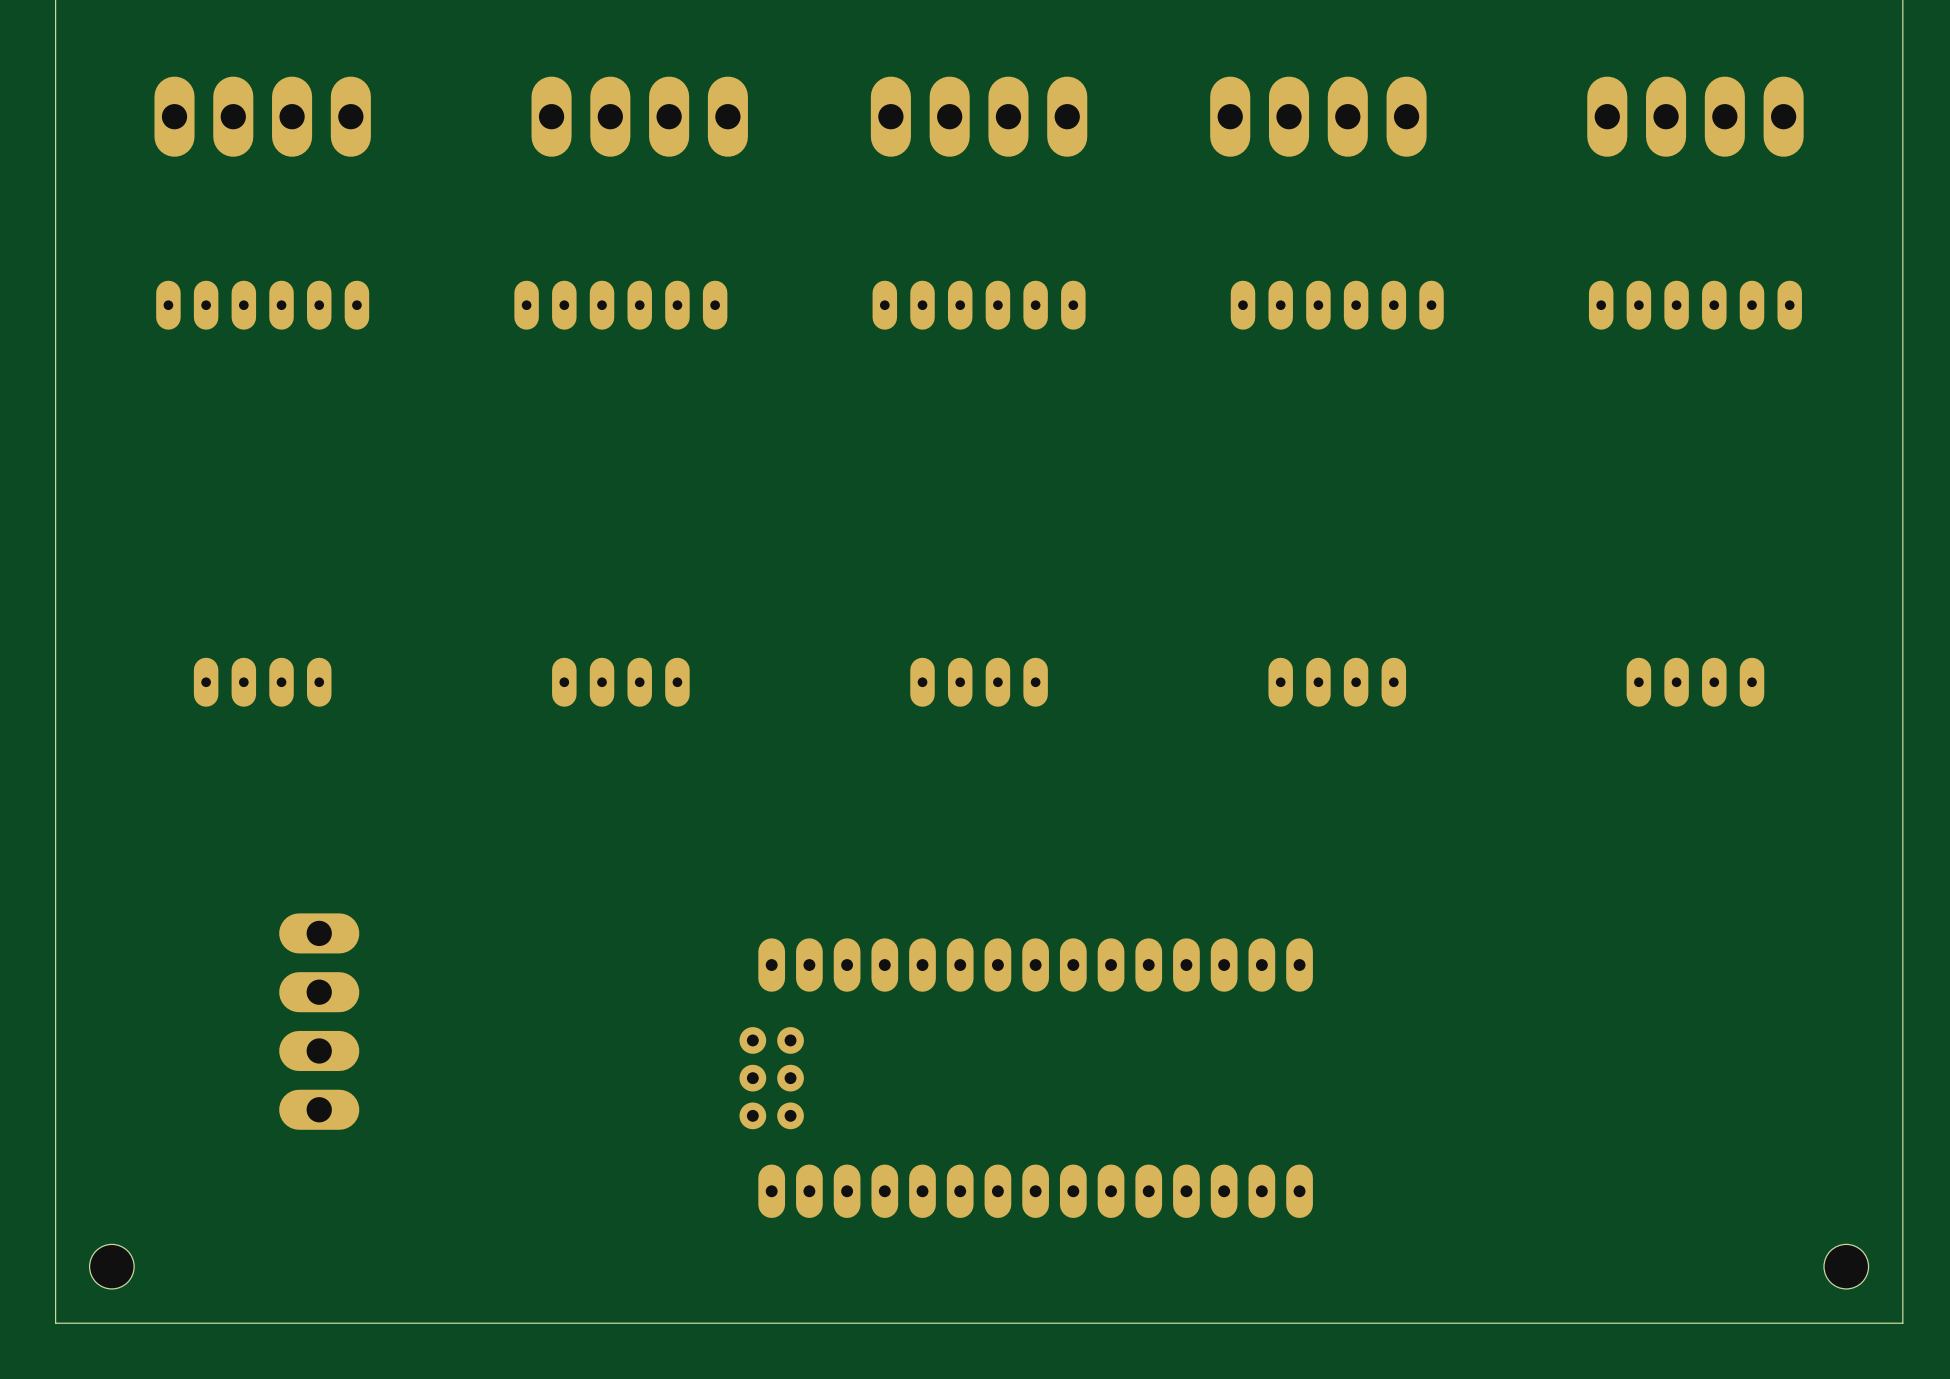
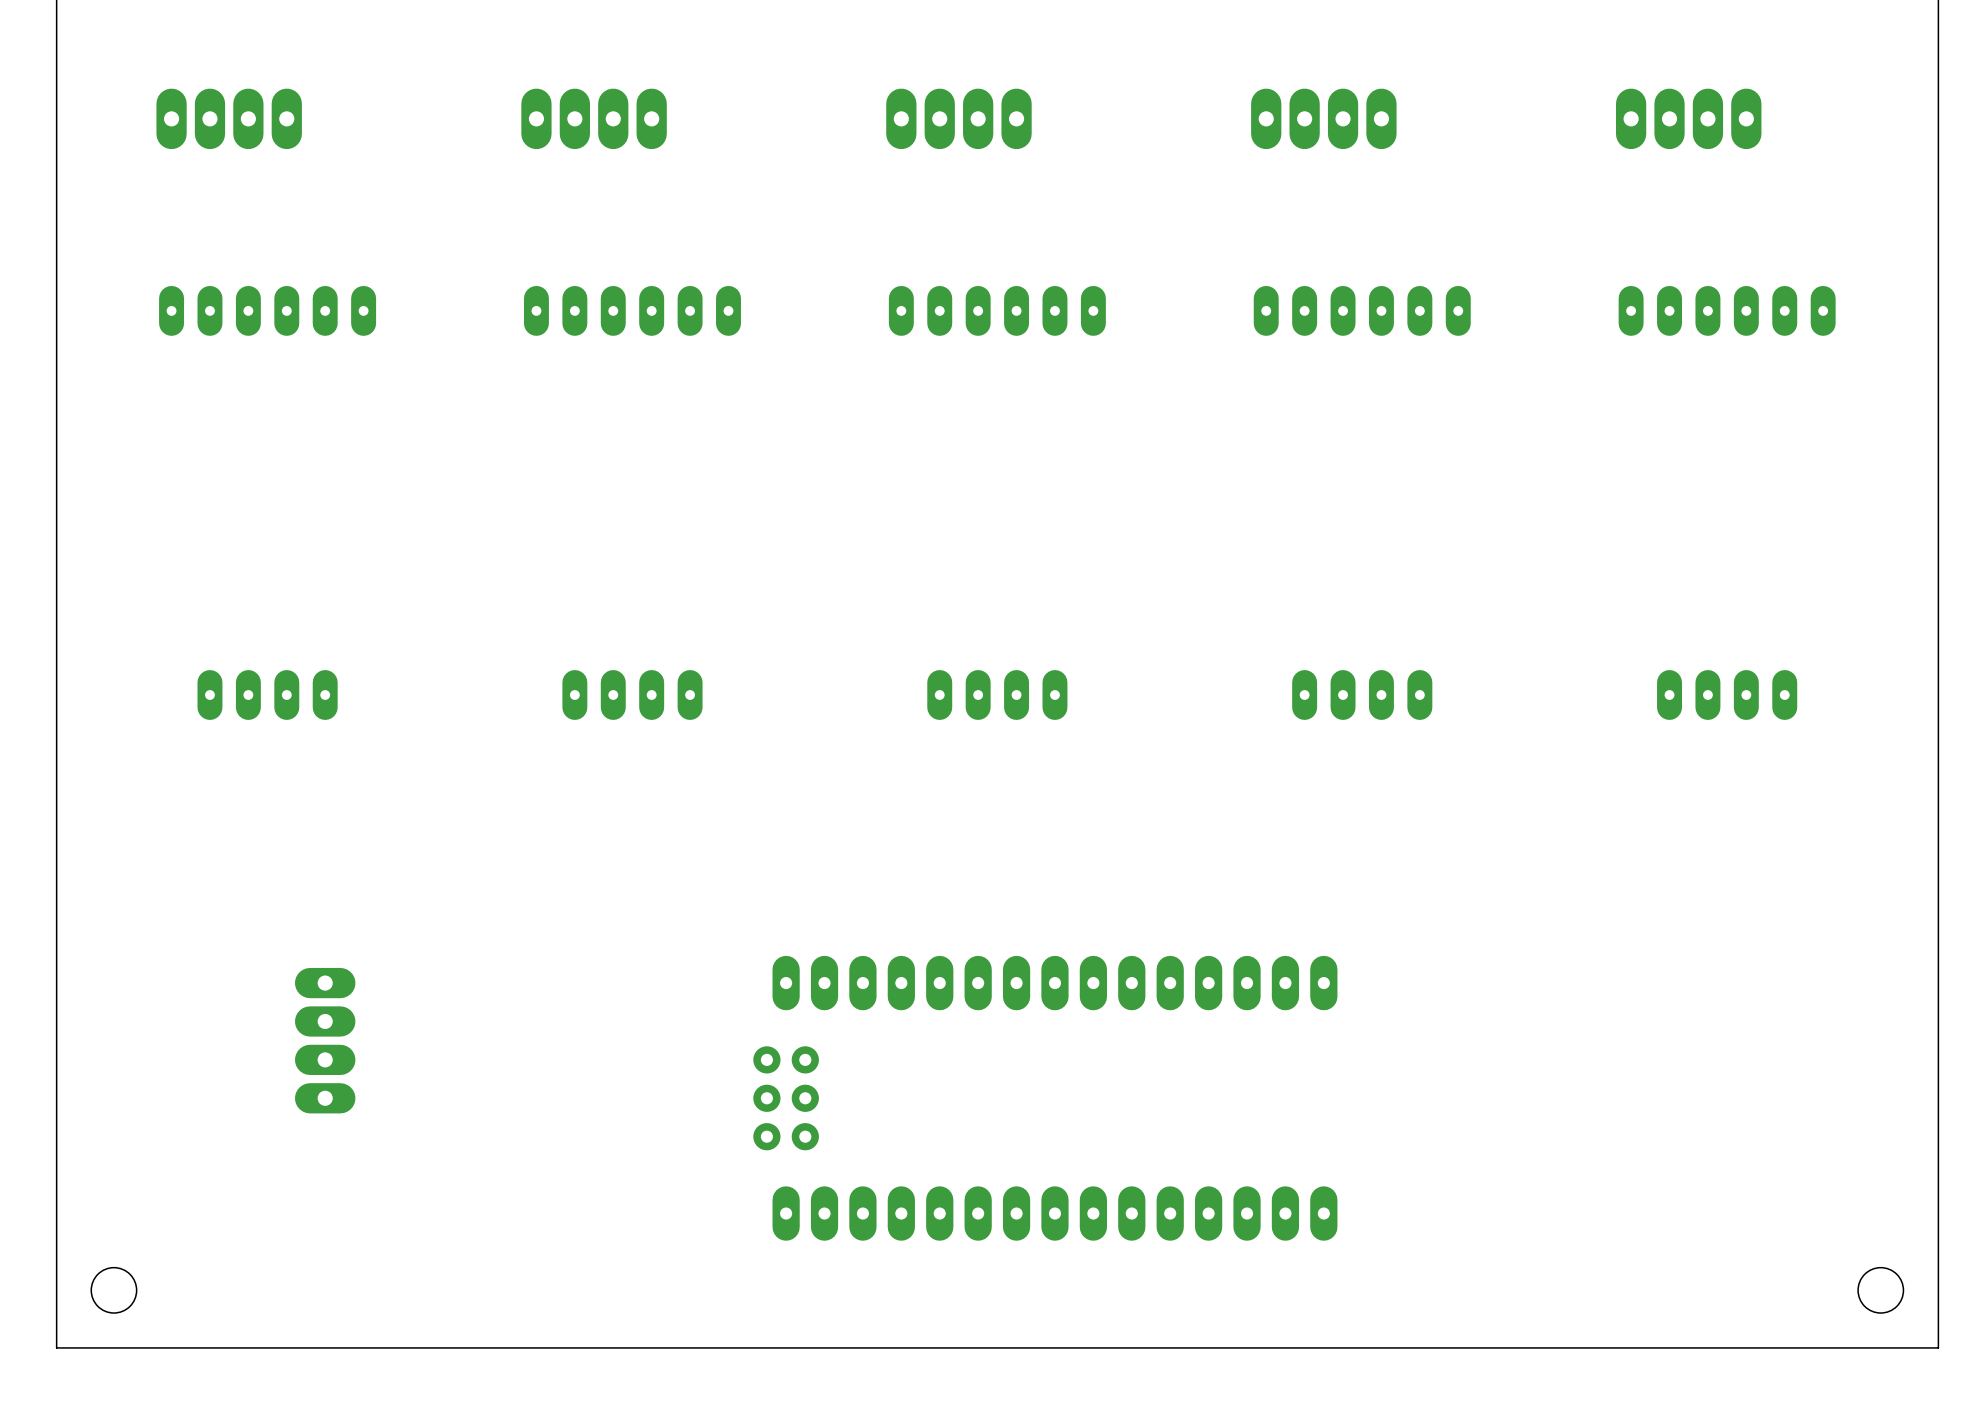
part: none -> (229, 118)
part: (262, 116) -> none
part: none -> (594, 118)
part: (639, 116) -> none
part: none -> (958, 118)
part: (979, 116) -> none
part: none -> (1323, 118)
part: (1318, 116) -> none
part: none -> (1688, 118)
part: (1695, 116) -> none
part footprint: [279, 913, 360, 1130] -> [294, 967, 356, 1114]

